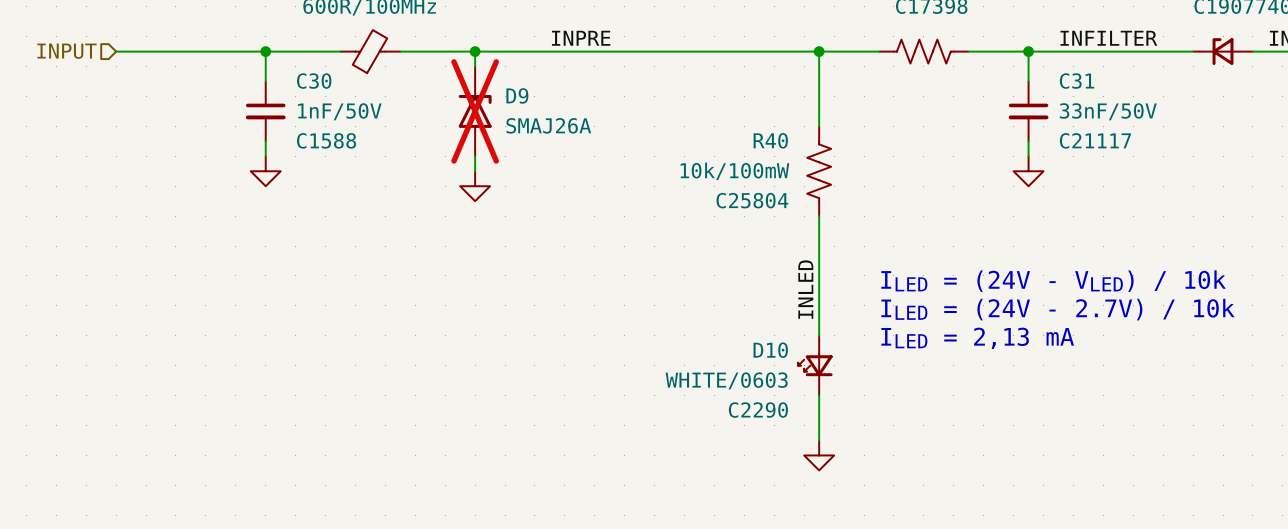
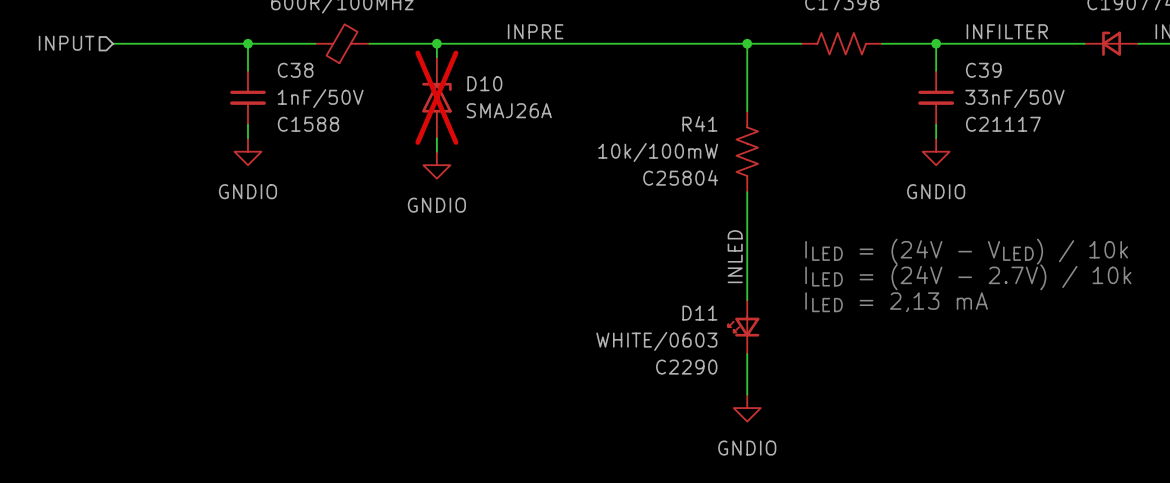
C30 name: C30 (314, 81) -> C38 (295, 70)
C31 name: C31 (1077, 81) -> C39 (983, 70)
D9 name: D9 (517, 95) -> D10 (484, 83)
R40 name: R40 (770, 140) -> R41 (699, 123)
power symbol text: none -> GNDIO (247, 191)
power symbol text: none -> GNDIO (936, 191)
power symbol text: none -> GNDIO (436, 205)
D10 name: D10 (770, 350) -> D11 (699, 313)
power symbol text: none -> GNDIO (747, 448)

